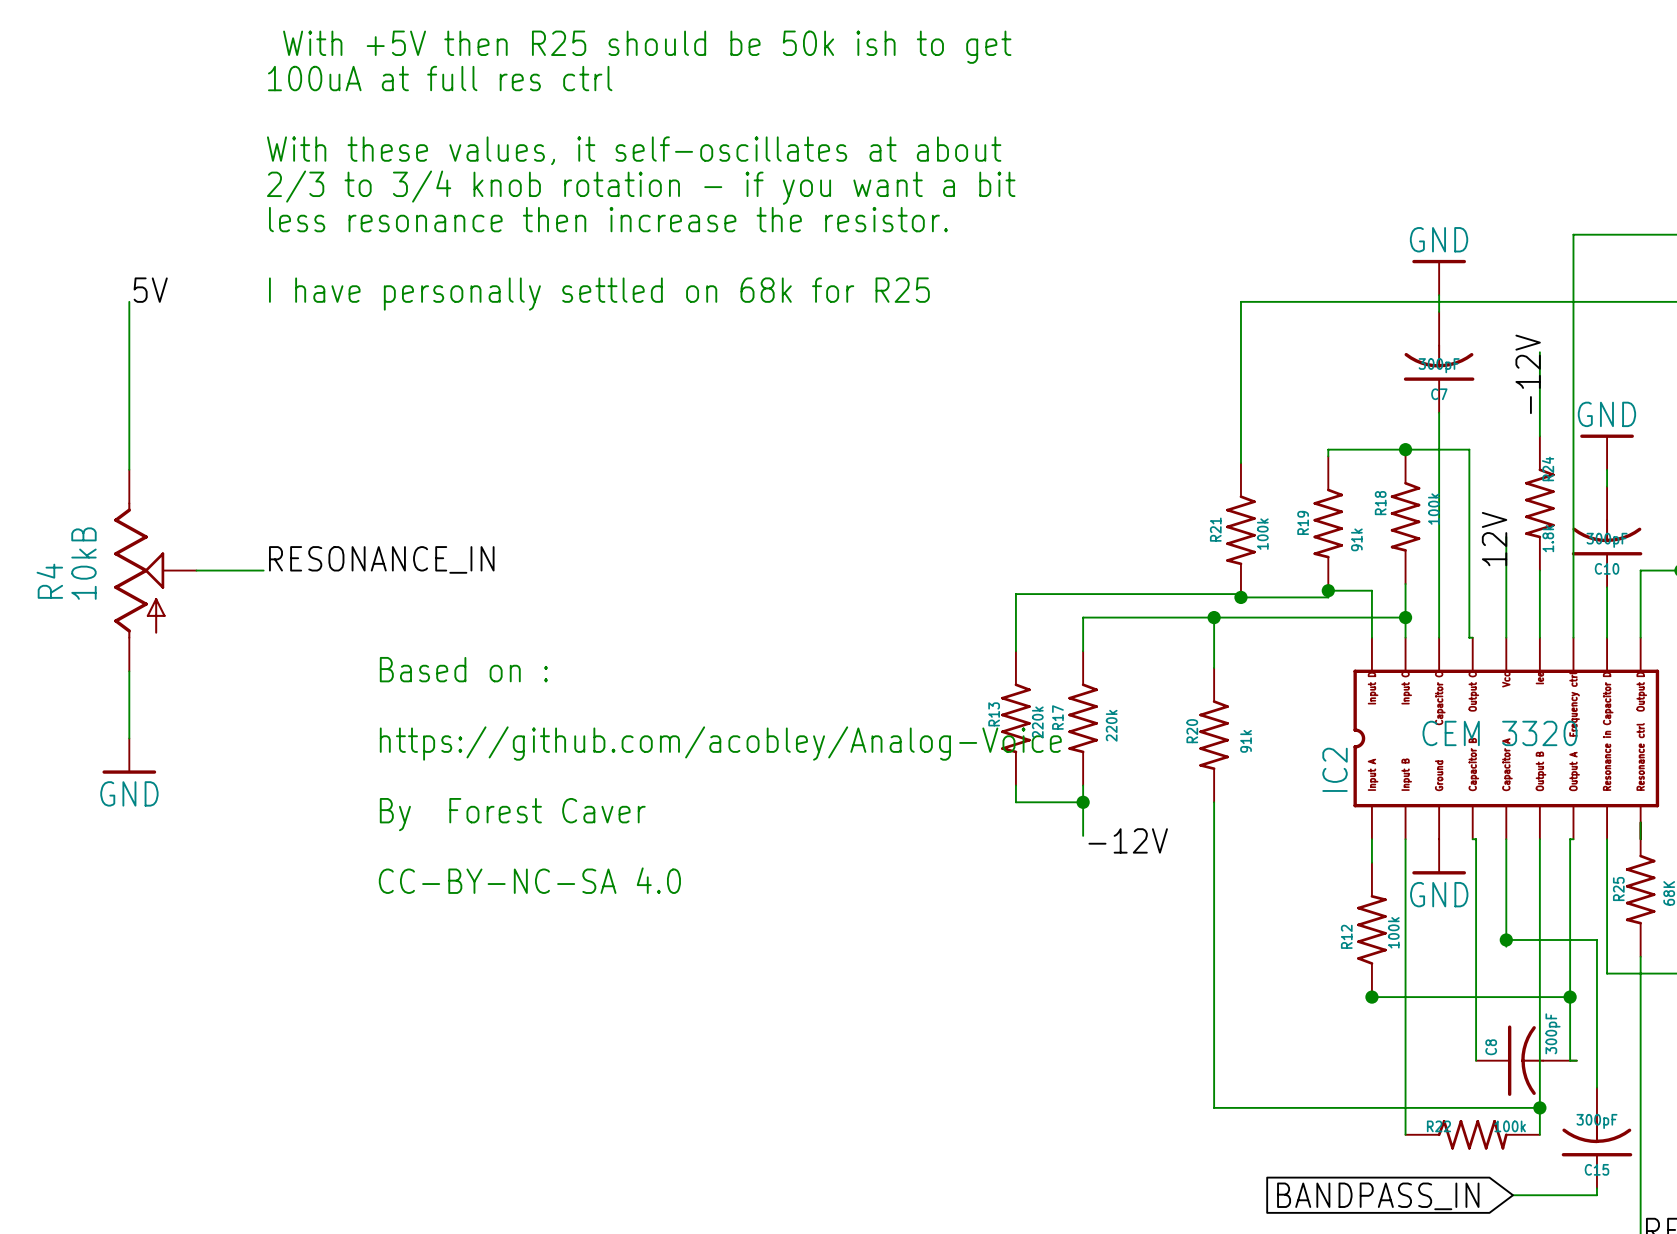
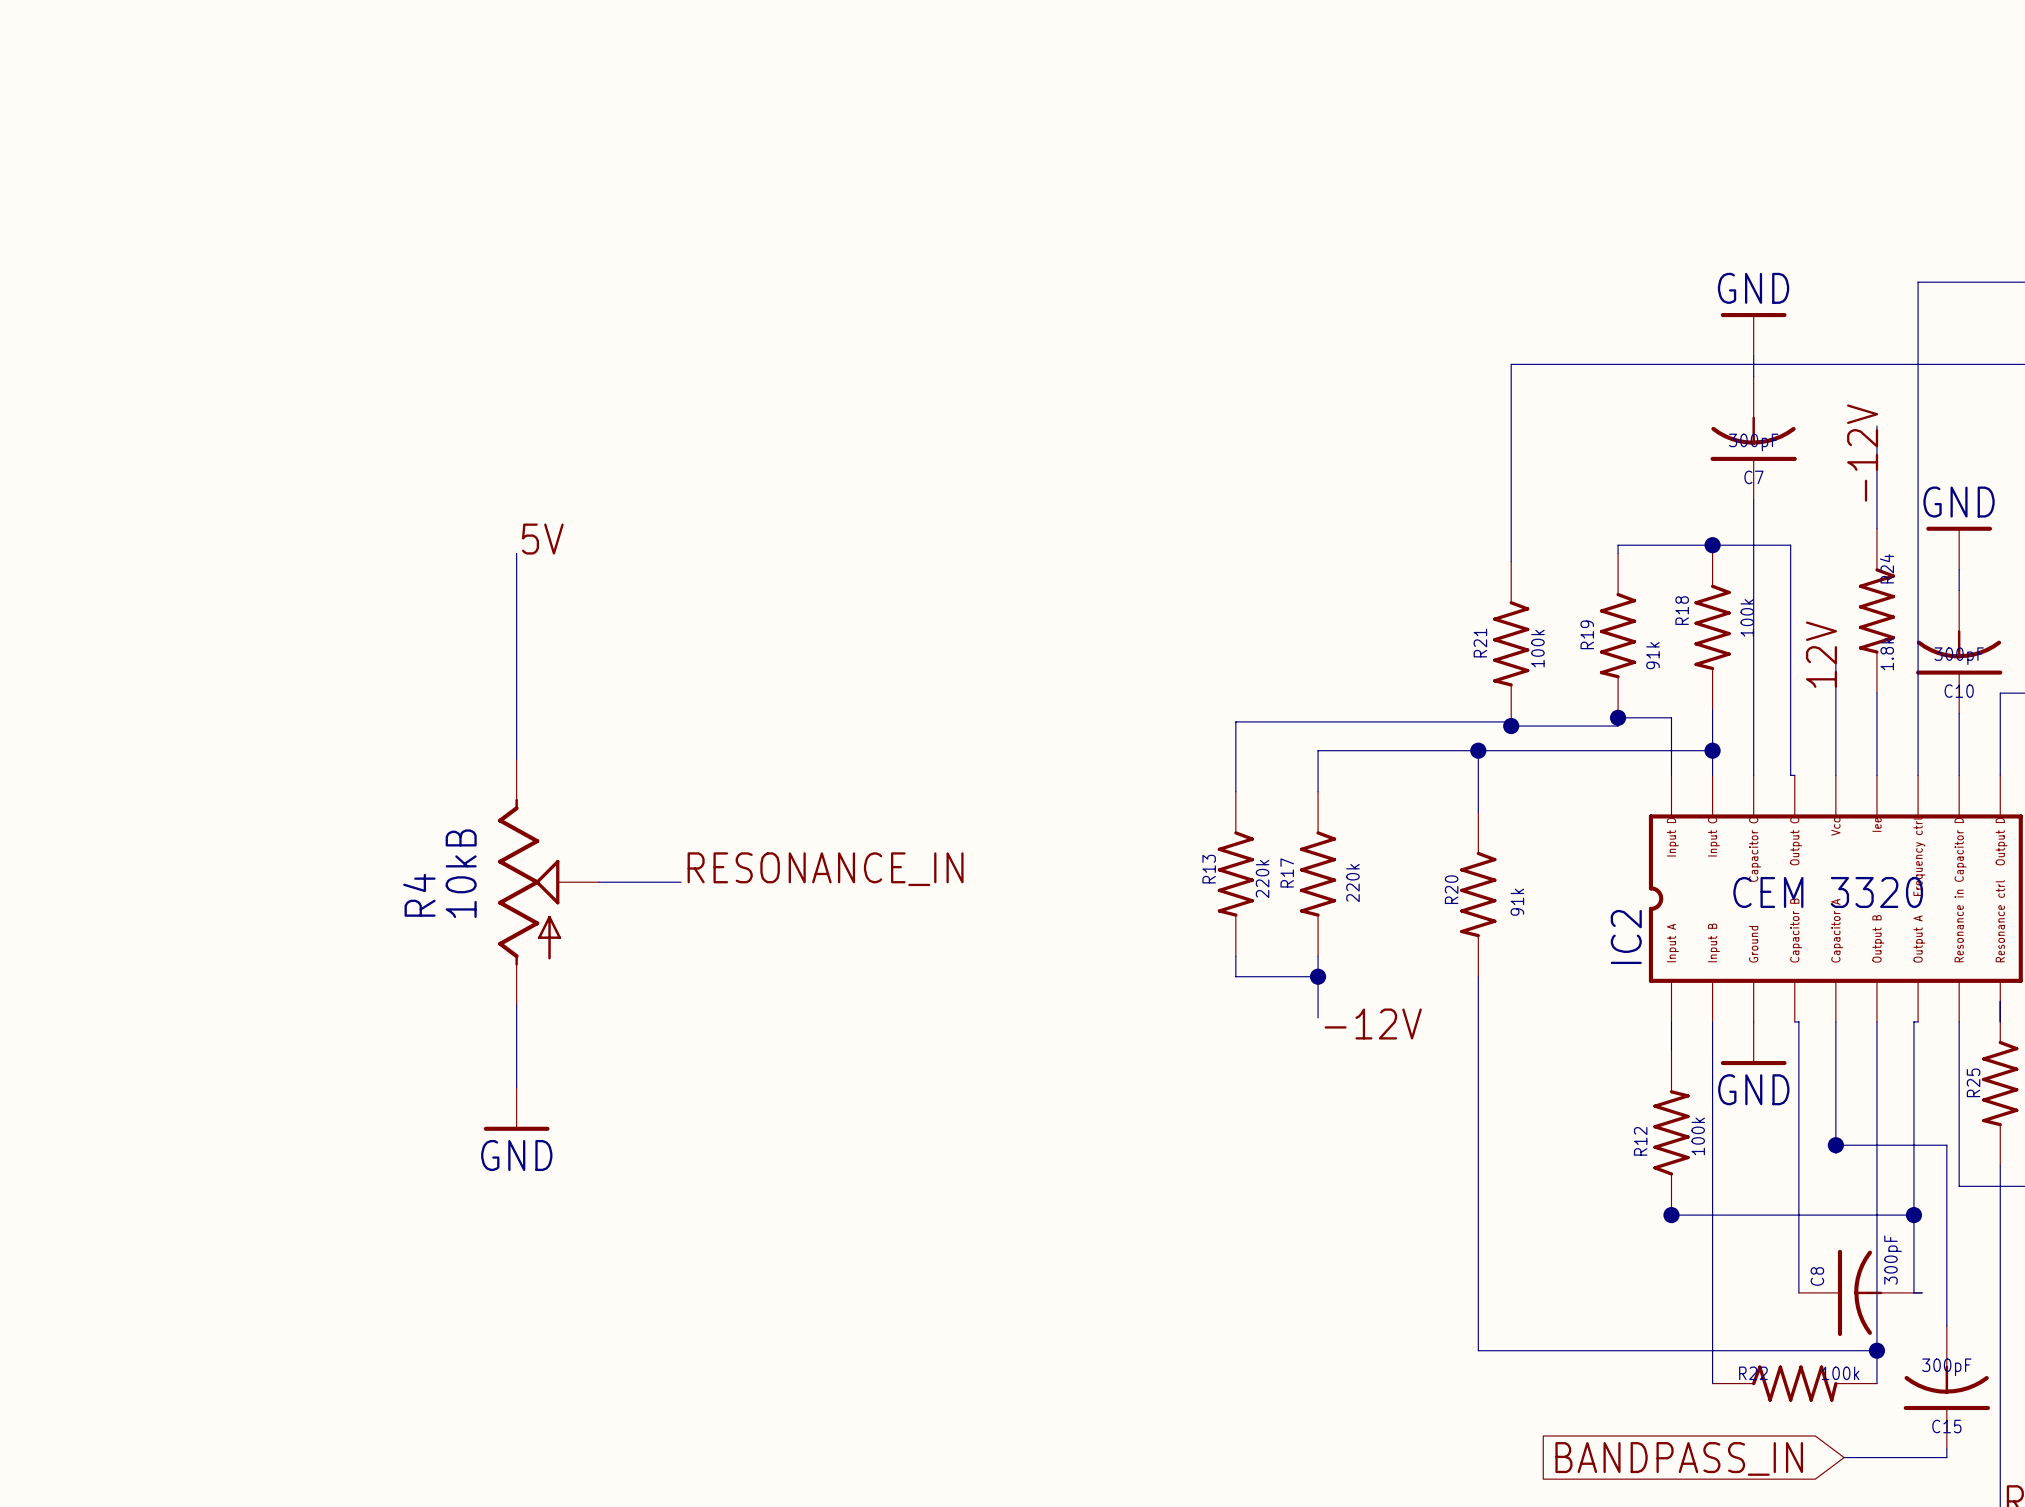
text: With +5V then R25 should be 50k ish to get (647, 47) -> none
text: 100uA at full res ctrl (440, 78) -> none
text: With these values, it self-oscillates at about (634, 150) -> none
text: 2/3 to 3/4 knob rotation - if you want a bit (641, 187) -> none
text: less resonance then increase the resistor. (608, 219) -> none
label: 5V (150, 290) -> none
text: I have personally settled on 68k for R25 (599, 294) -> none
wire: (129, 301) (129, 469) -> none
label: none -> 5V (542, 539)
wire: none -> (516, 553) (516, 758)
label: RESONANCE_IN (381, 559) -> none
R4 position: (155, 570) -> (548, 882)
wire: (196, 570) (263, 570) -> none
text: Based on : (463, 669) -> none
wire: (129, 671) (129, 738) -> none
label: none -> RESONANCE_IN (825, 869)
wire: none -> (598, 882) (681, 882)
text: https://github.com/acobley/Analog-Voice (720, 743) -> none
power symbol: GND (129, 756) -> none
text: By Forest Caver (512, 814) -> none
wire: none -> (516, 1005) (516, 1087)
text: CC-BY-NC-SA 4.0 (529, 880) -> none
power symbol: none -> GND (516, 1109)

